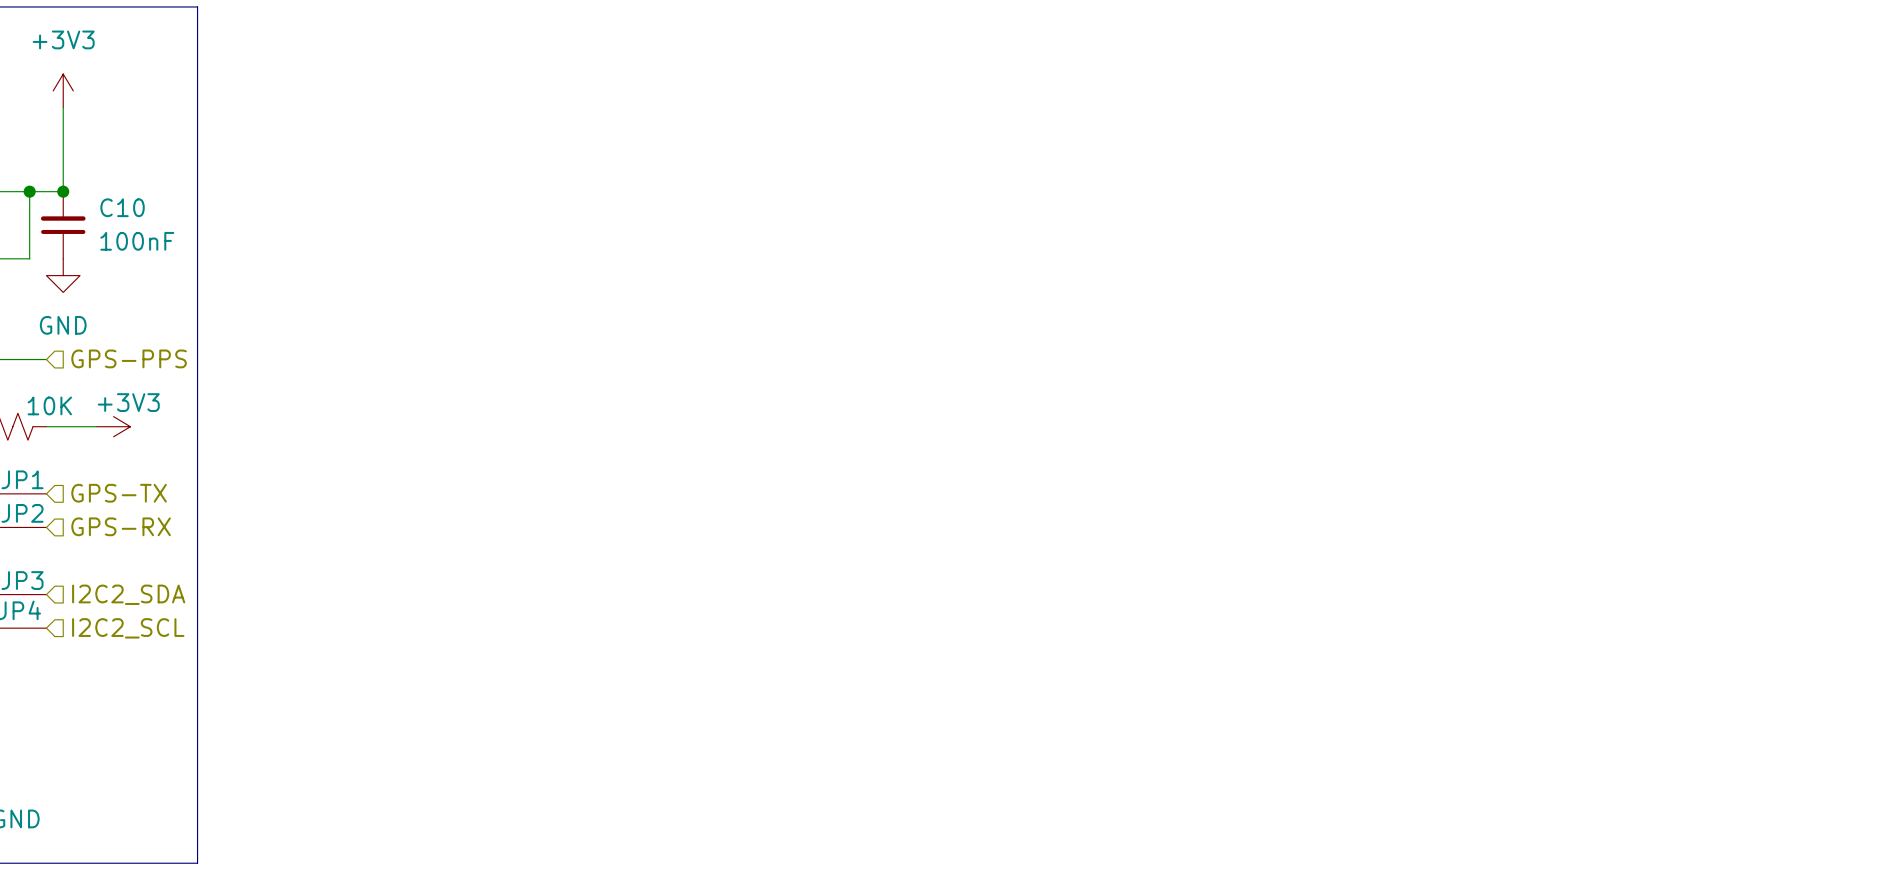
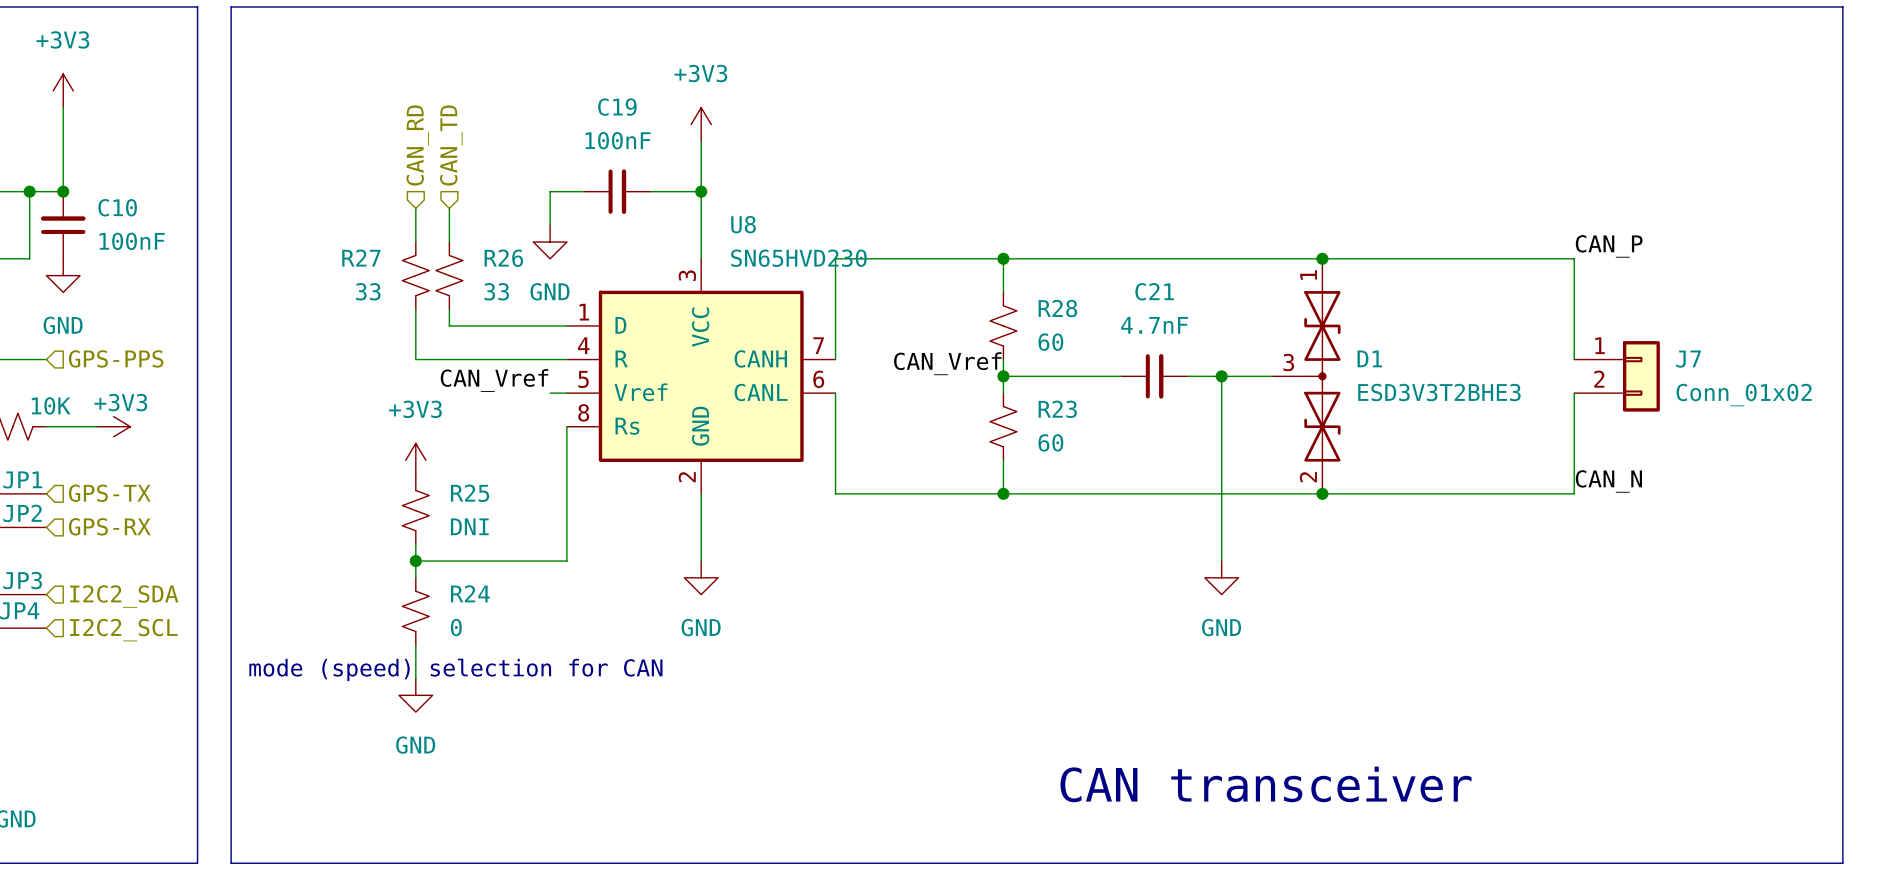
line: none -> (231, 6) (1842, 6) (1842, 863) (231, 863) (231, 6)
power symbol: none -> +3V3 (701, 124)
hierarchical label: none -> CAN_RD (417, 145)
hierarchical label: none -> CAN_TD (451, 145)
wire: none -> (701, 141) (701, 258)
wire: none -> (583, 191) (550, 191) (550, 225)
C19: none -> 100nF (617, 191)
wire: none -> (650, 191) (701, 191)
junction: none -> (701, 191)
wire: none -> (415, 208) (415, 242)
wire: none -> (449, 208) (449, 242)
power symbol: none -> GND (550, 242)
label: none -> CAN_P (1609, 246)
wire: none -> (1003, 258) (1003, 292)
junction: none -> (1003, 258)
junction: none -> (1322, 258)
R27: none -> 33 (415, 275)
R26: none -> 33 (449, 275)
wire: none -> (415, 309) (415, 359) (566, 359)
wire: none -> (449, 309) (449, 325) (566, 325)
R28: none -> 60 (1003, 325)
wire: none -> (835, 359) (835, 258) (1574, 258) (1574, 359)
wire: none -> (1003, 359) (1003, 393)
label: none -> CAN_Vref (947, 363)
U8: none -> SN65HVD230 (701, 376)
wire: none -> (1003, 376) (1120, 376)
junction: none -> (1003, 376)
C21: none -> 4.7nF (1154, 376)
wire: none -> (1188, 376) (1272, 376)
wire: none -> (1221, 376) (1221, 561)
junction: none -> (1221, 376)
D1: none -> ESD3V3T2BHE3 (1306, 376)
J7: none -> Conn_01x02 (1617, 376)
label: none -> CAN_Vref (494, 380)
wire: none -> (550, 393) (566, 393)
wire: none -> (835, 393) (835, 493) (1574, 493) (1574, 393)
wire: none -> (566, 426) (566, 561) (415, 561)
R23: none -> 60 (1003, 426)
power symbol: none -> +3V3 (415, 460)
wire: none -> (1003, 460) (1003, 493)
label: none -> CAN_N (1608, 481)
wire: none -> (701, 493) (701, 561)
junction: none -> (1003, 493)
junction: none -> (1322, 493)
R25: none -> DNI (415, 510)
wire: none -> (415, 544) (415, 577)
junction: none -> (415, 561)
power symbol: none -> GND (701, 577)
power symbol: none -> GND (1221, 577)
R24: none -> 0 (415, 611)
wire: none -> (415, 644) (415, 678)
text: none -> mode (speed) selection for CAN (455, 669)
power symbol: none -> GND (415, 695)
text: none -> CAN transceiver (1266, 784)

